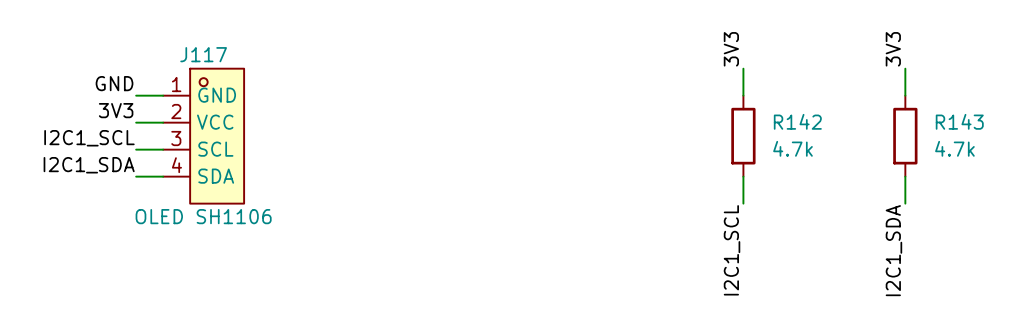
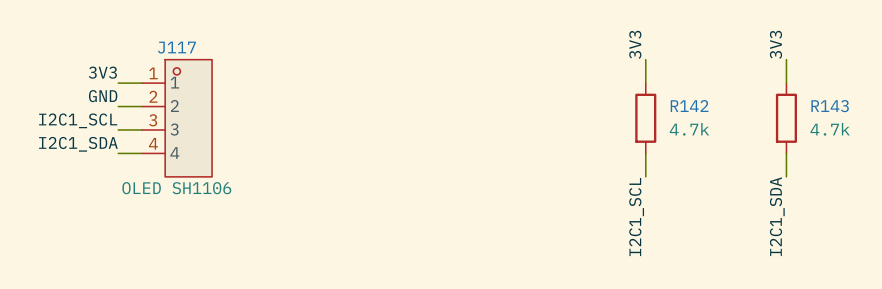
label: GND (114, 83) -> 3V3 (102, 72)
J117 pin name: GND (217, 95) -> 1 (174, 82)
label: 3V3 (116, 110) -> GND (103, 96)
J117 pin name: VCC (215, 122) -> 2 (174, 106)
J117 pin name: SCL (215, 149) -> 3 (174, 129)
J117 pin name: SDA (216, 176) -> 4 (174, 153)

